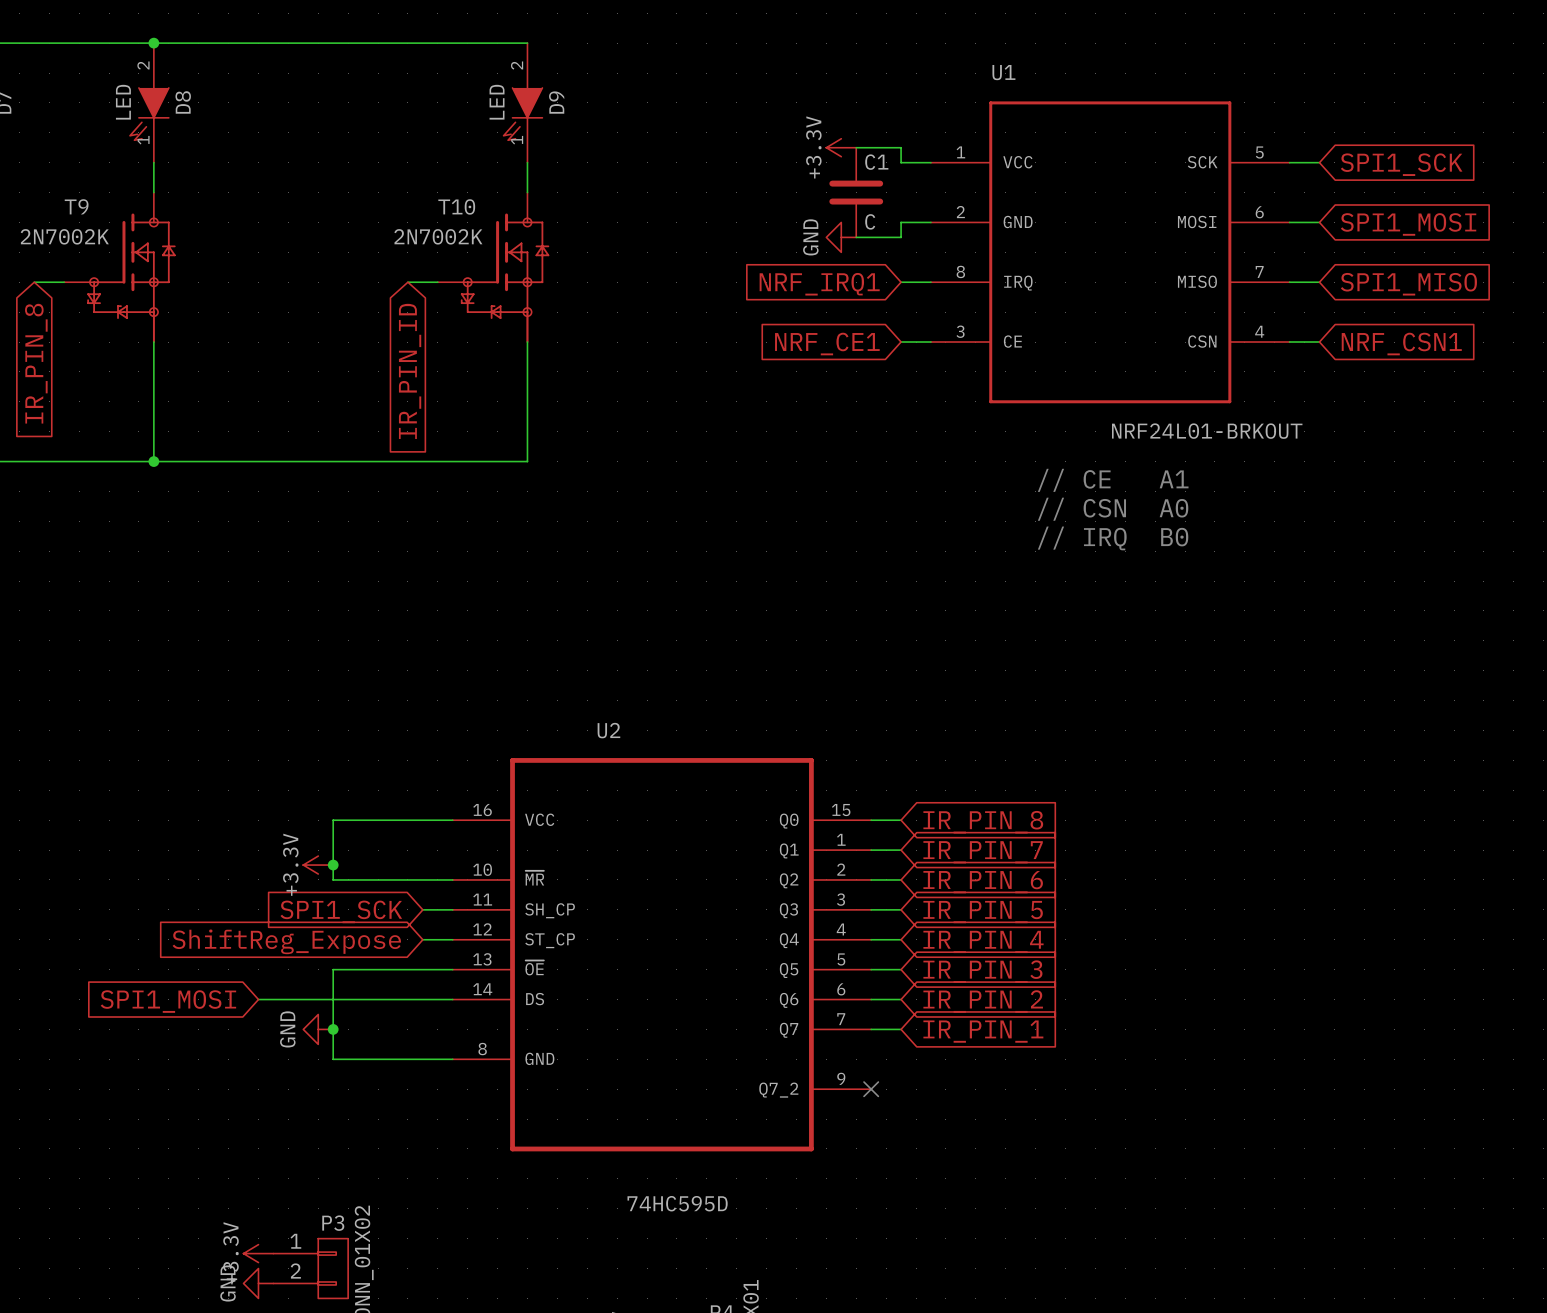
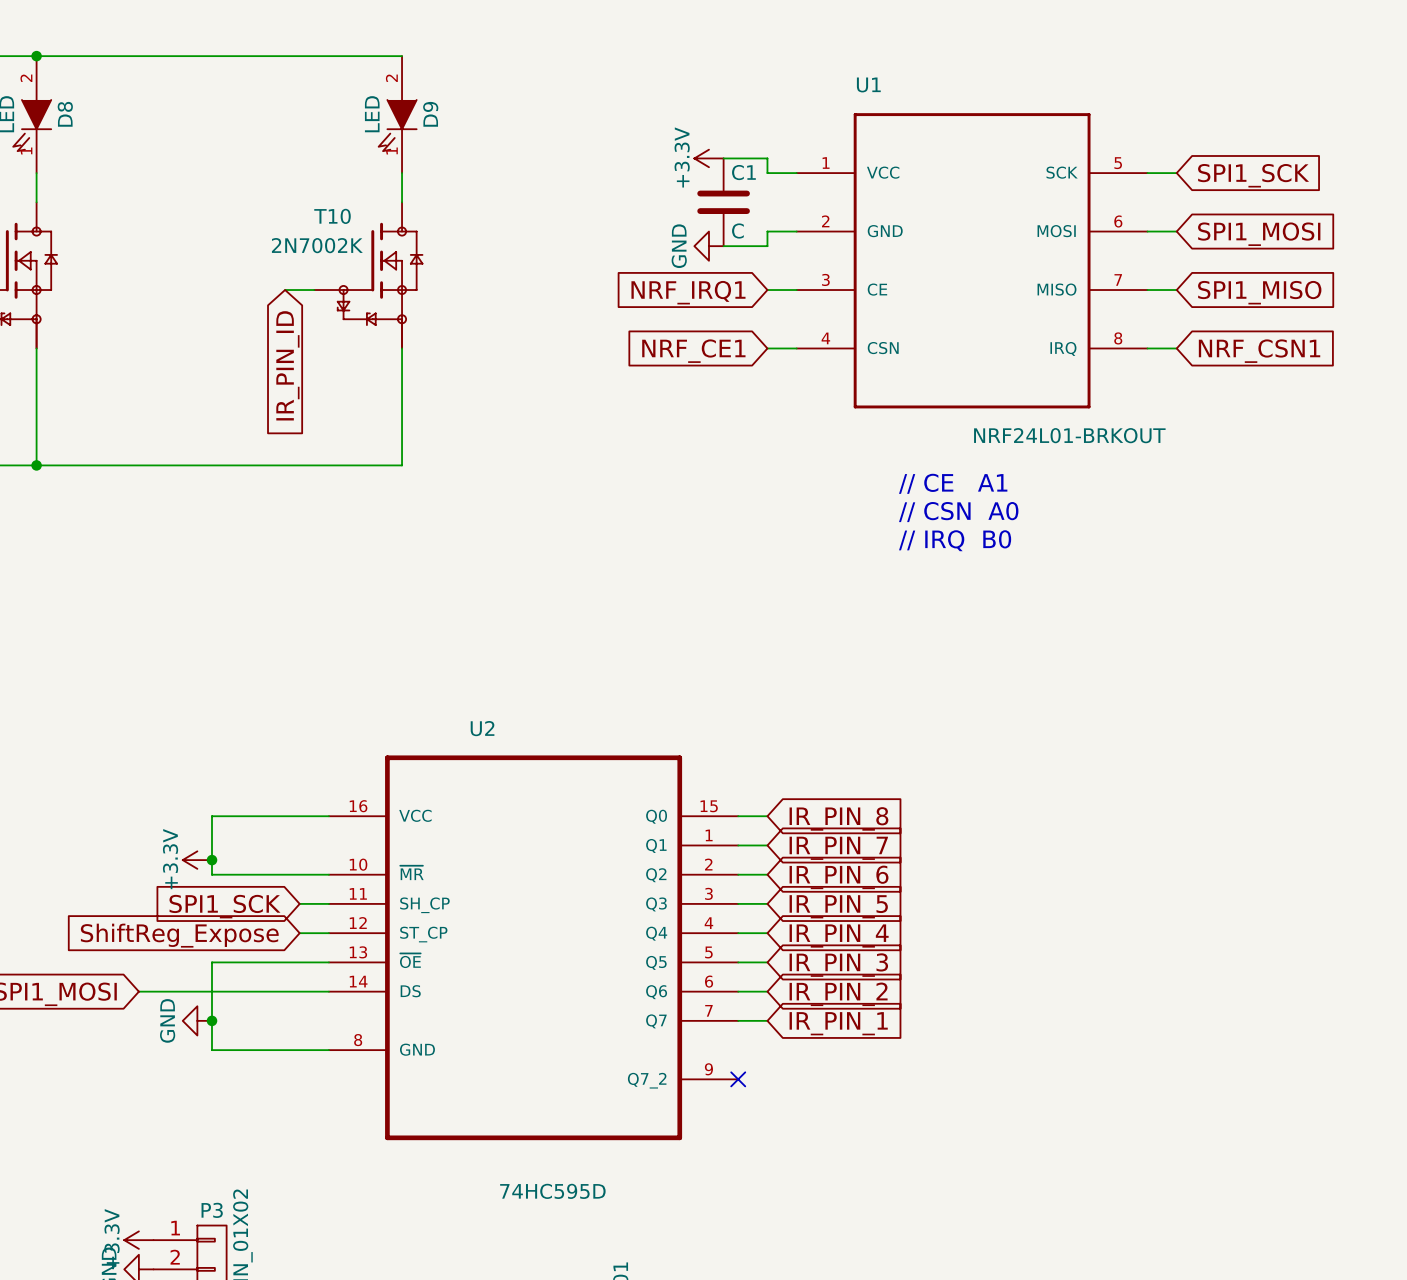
U1 pin number: 8 (960, 271) -> 3 (825, 279)
U1 pin name: IRQ (1018, 283) -> CE (877, 289)
U1 pin number: 3 (960, 331) -> 4 (825, 338)
U1 pin number: 4 (1259, 331) -> 8 (1118, 338)
U1 pin name: CE (1012, 341) -> CSN (883, 348)
U1 pin name: CSN (1202, 341) -> IRQ (1063, 348)

